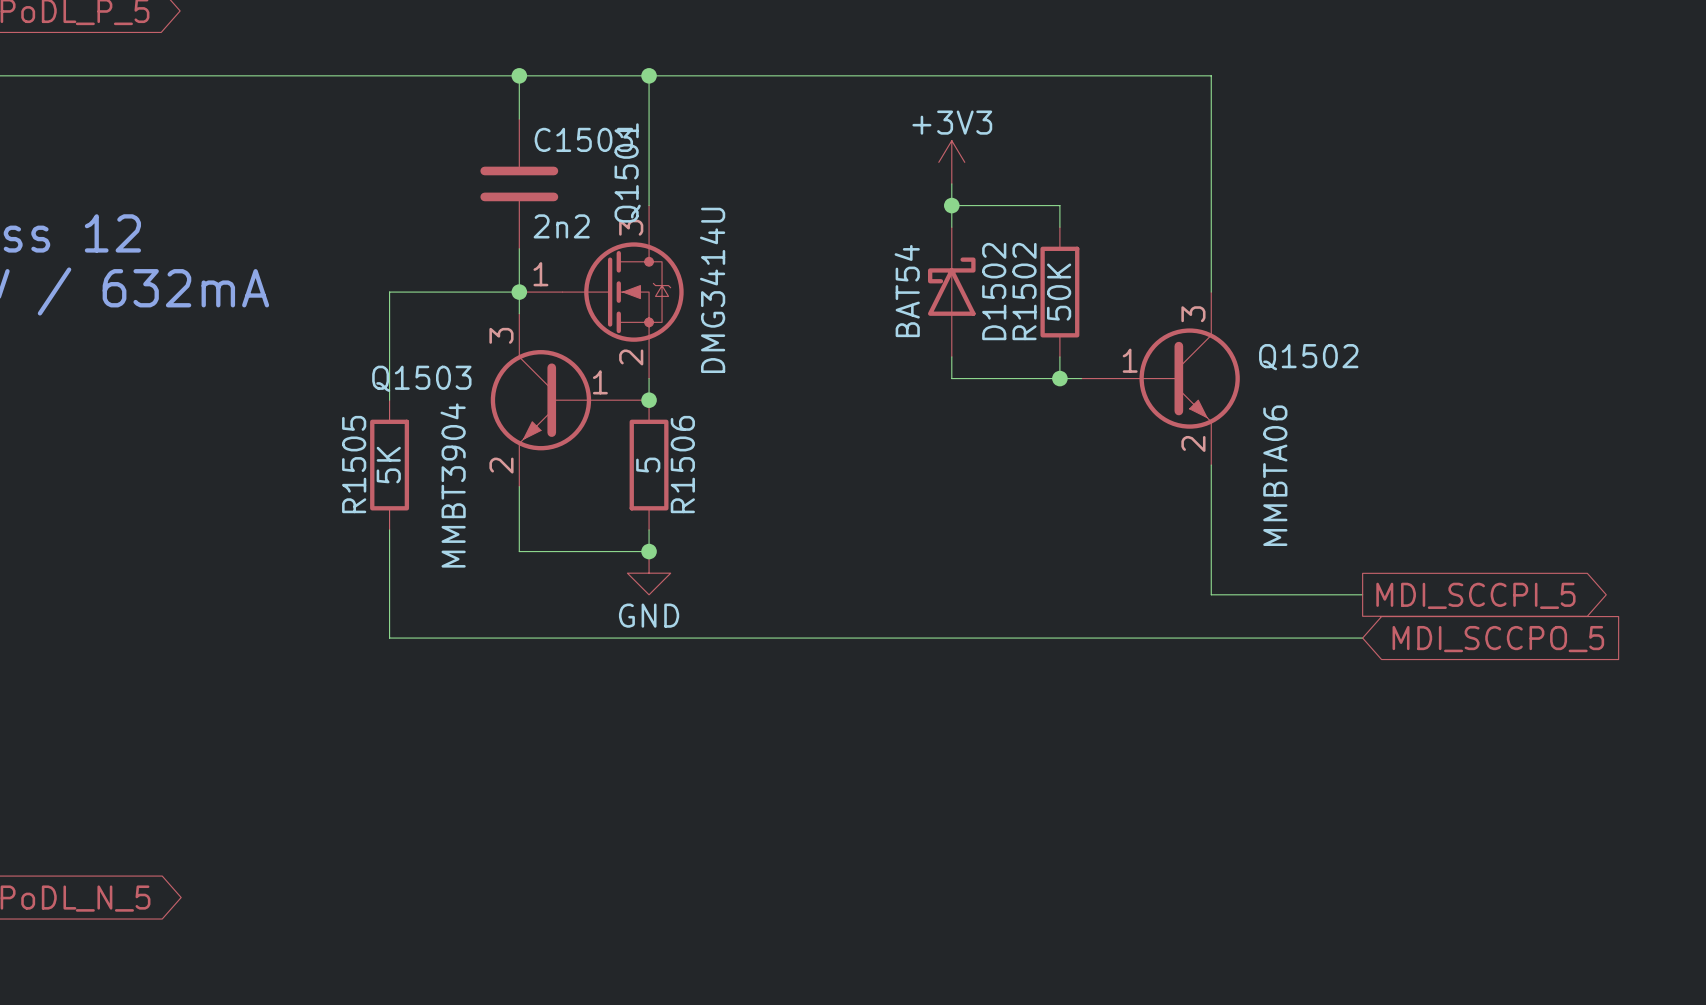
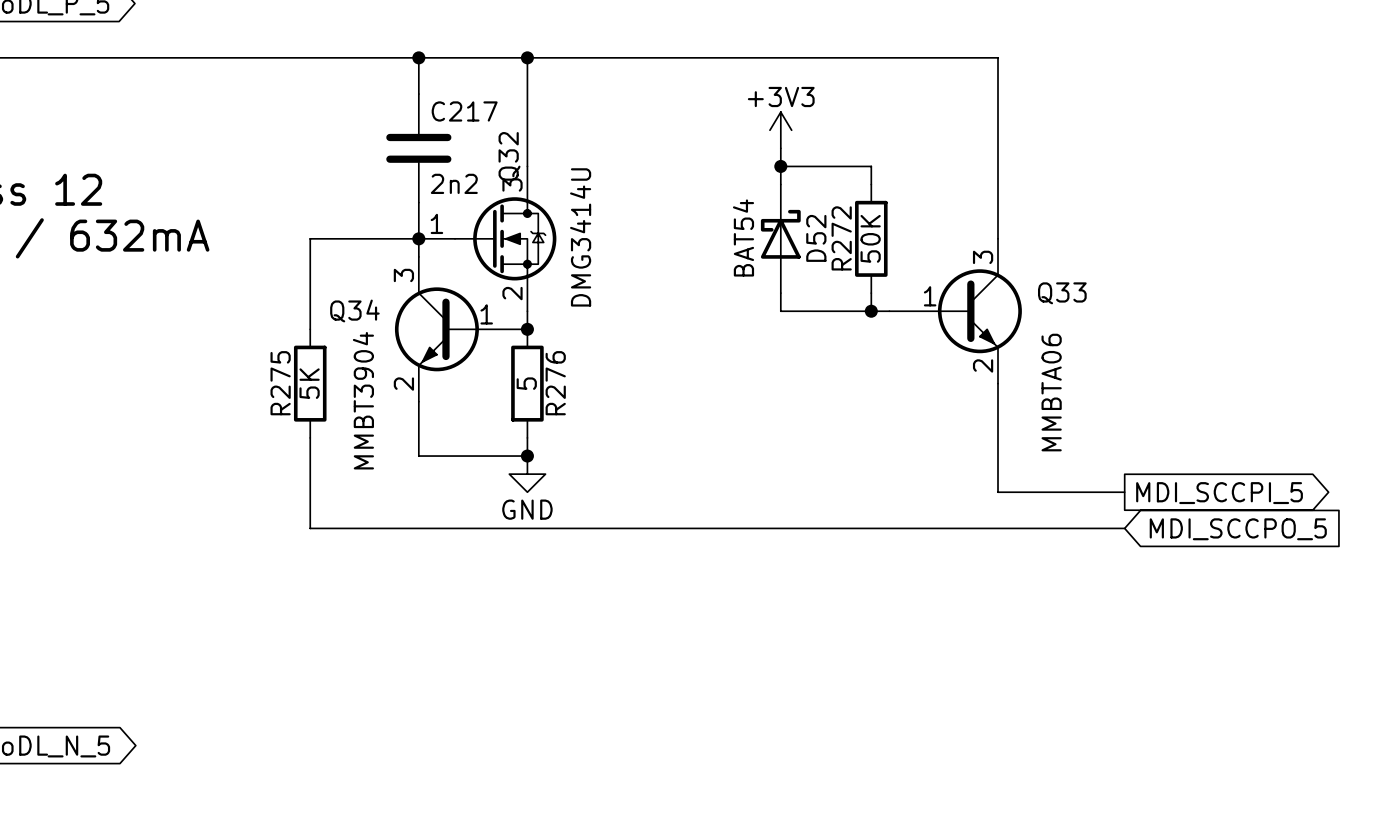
C1503 name: C1503 (583, 139) -> C217 (464, 111)
Q1501 name: Q1501 (627, 172) -> Q32 (509, 156)
D1502 name: D1502 (994, 291) -> D52 (816, 238)
R1502 name: R1502 (1024, 291) -> R272 (841, 238)
Q1502 name: Q1502 (1308, 357) -> Q33 (1062, 293)
Q1503 name: Q1503 (421, 378) -> Q34 (354, 310)
R1505 name: R1505 (354, 464) -> R275 (280, 383)
R1506 name: R1506 (682, 464) -> R276 (555, 383)

